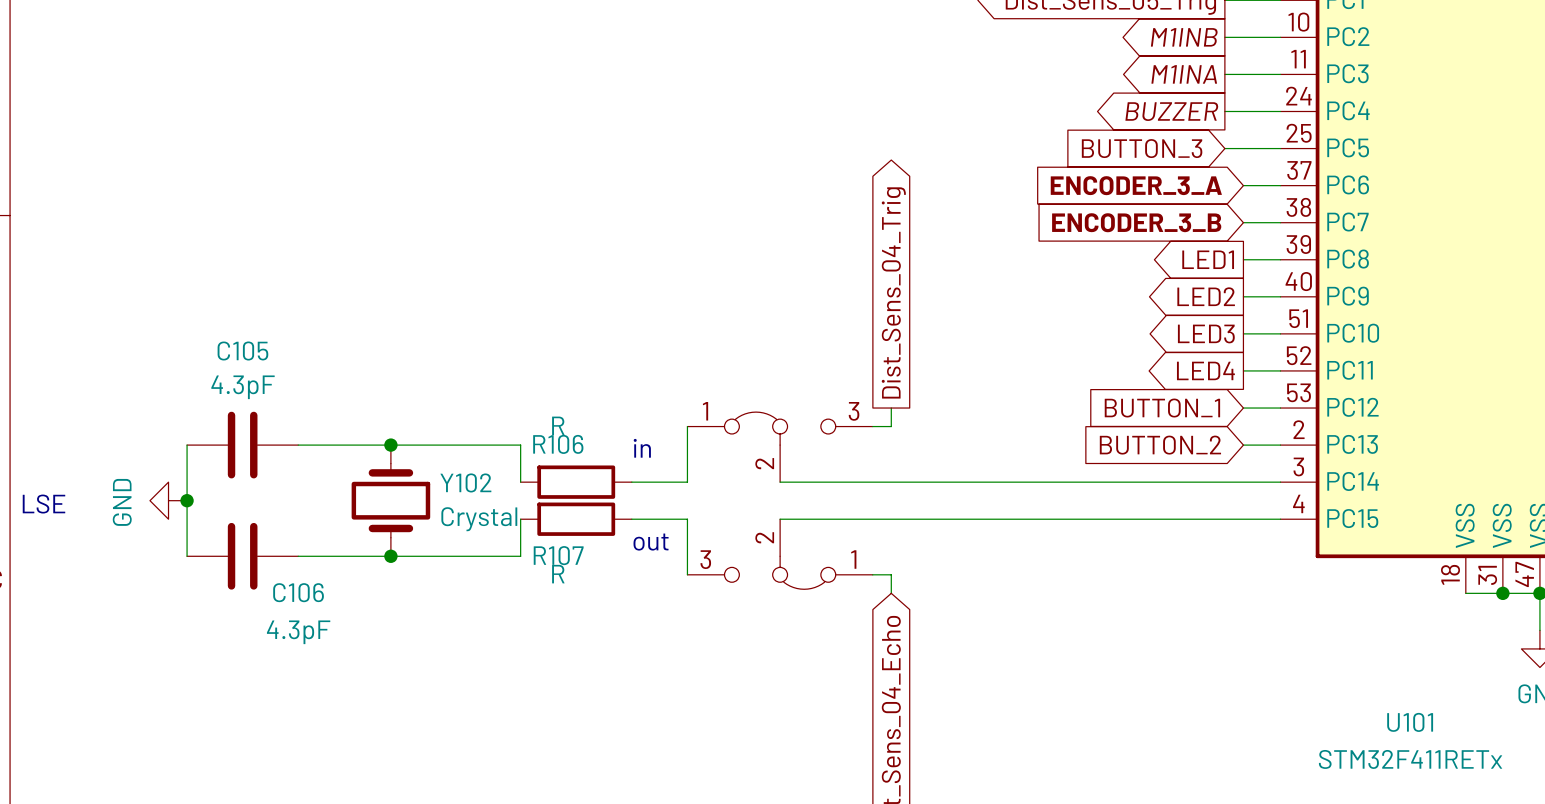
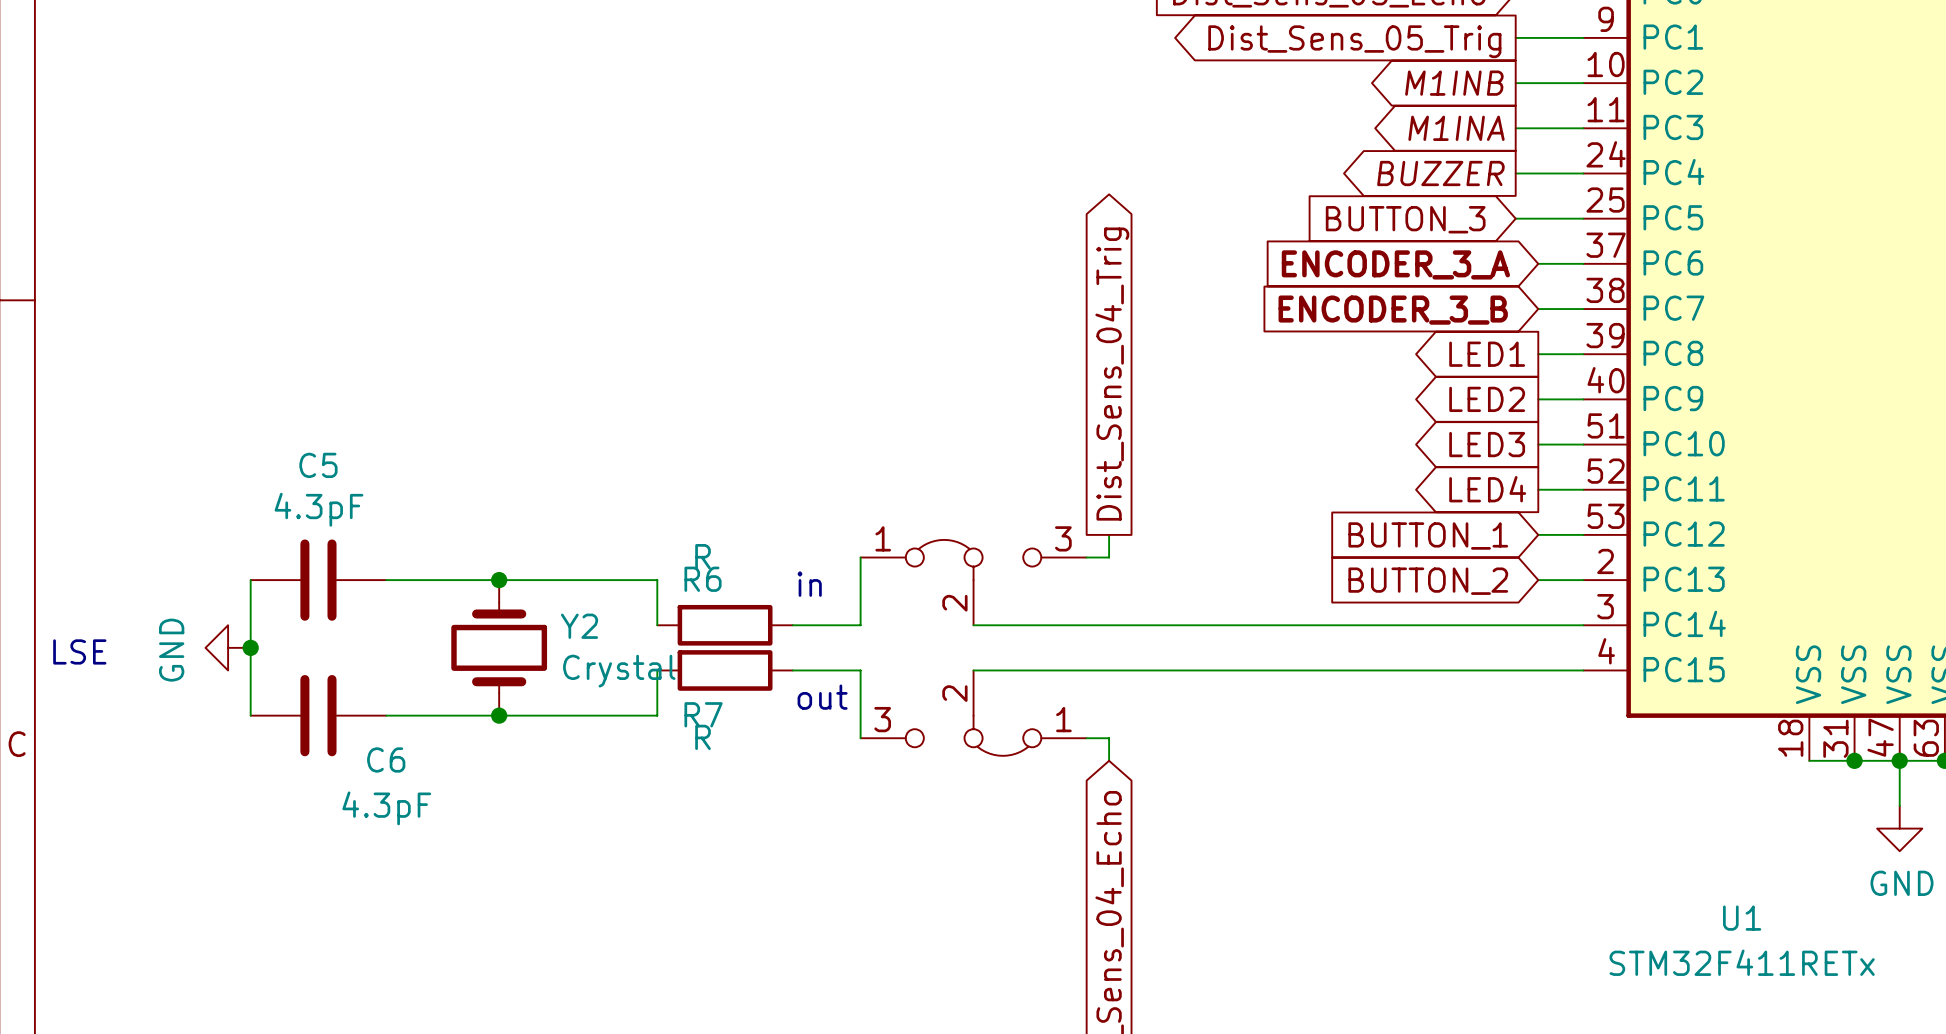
C105 name: C105 (242, 351) -> C5 (318, 465)
R106 name: R106 (558, 444) -> R6 (703, 579)
Y102 name: Y102 (465, 482) -> Y2 (579, 626)
R107 name: R107 (558, 555) -> R7 (703, 714)
C106 name: C106 (298, 592) -> C6 (386, 759)
U101 name: U101 (1410, 722) -> U1 (1742, 918)

